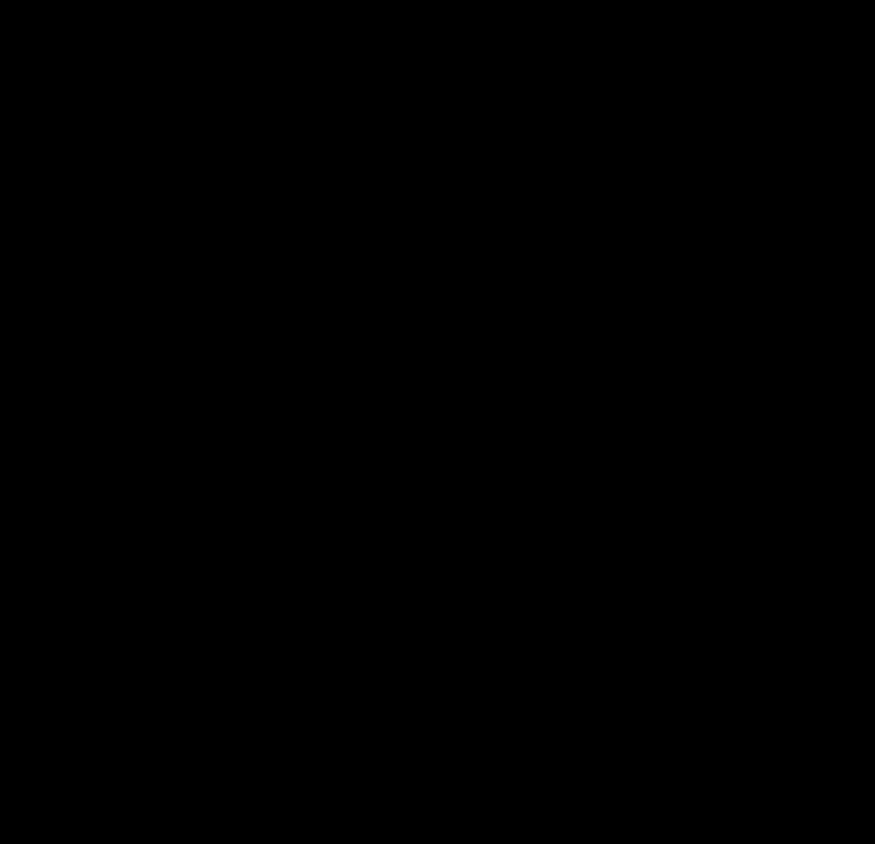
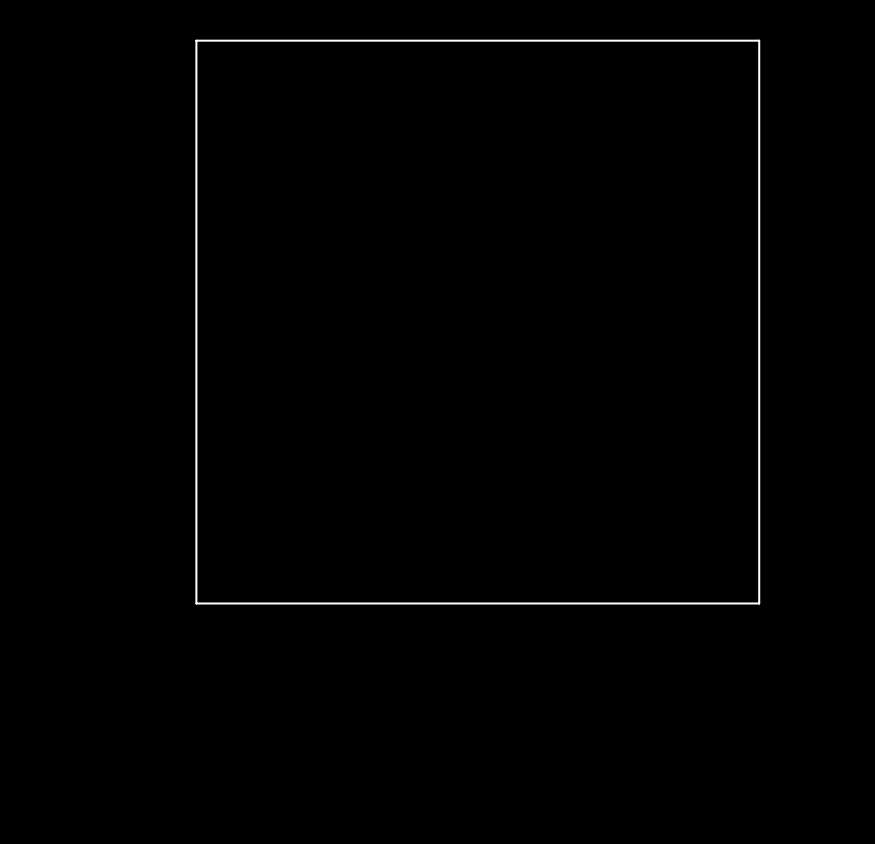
board edge: none -> (196, 40) (759, 40) (759, 603) (196, 603) (196, 40)

